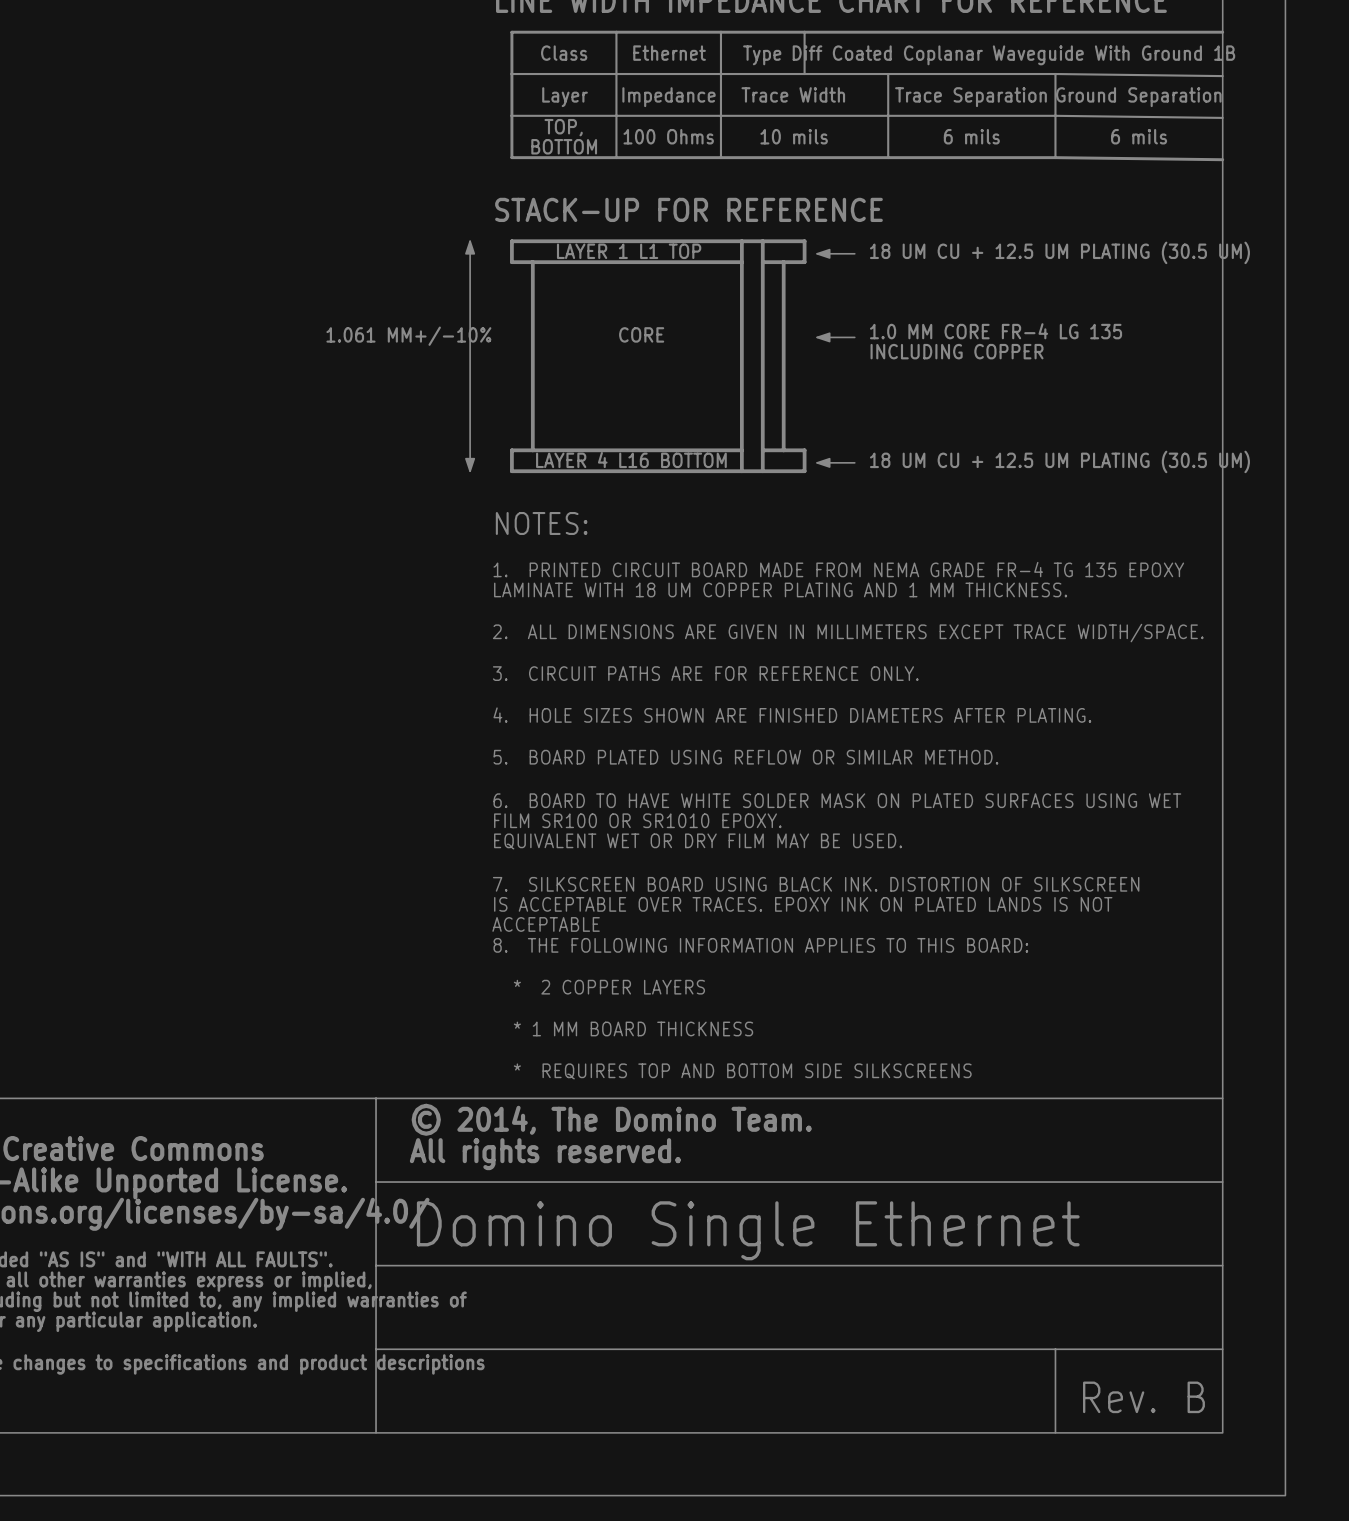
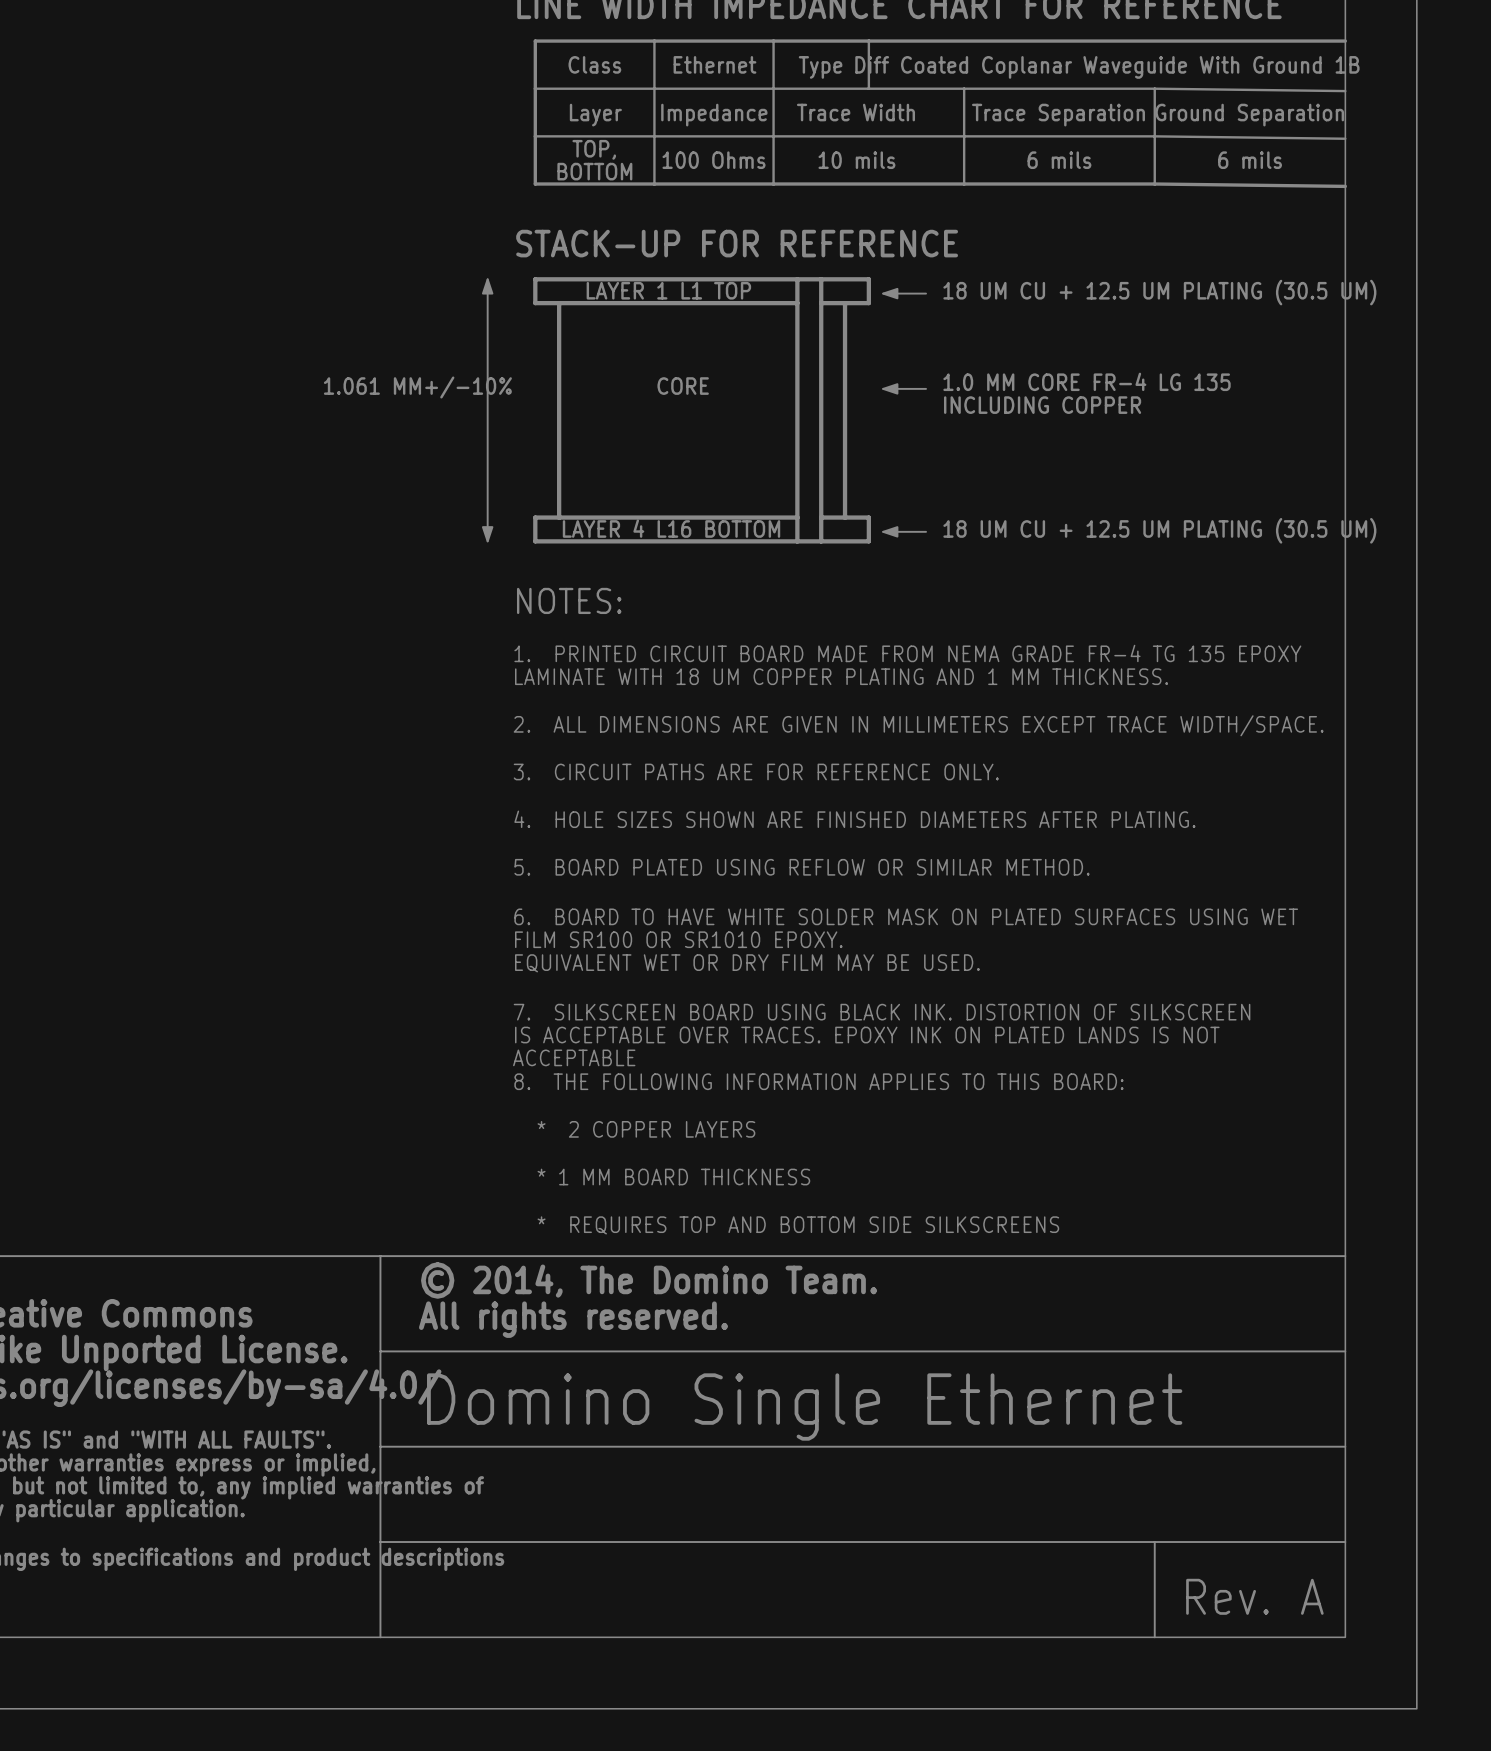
text: B (1196, 1397) -> A (1312, 1596)

